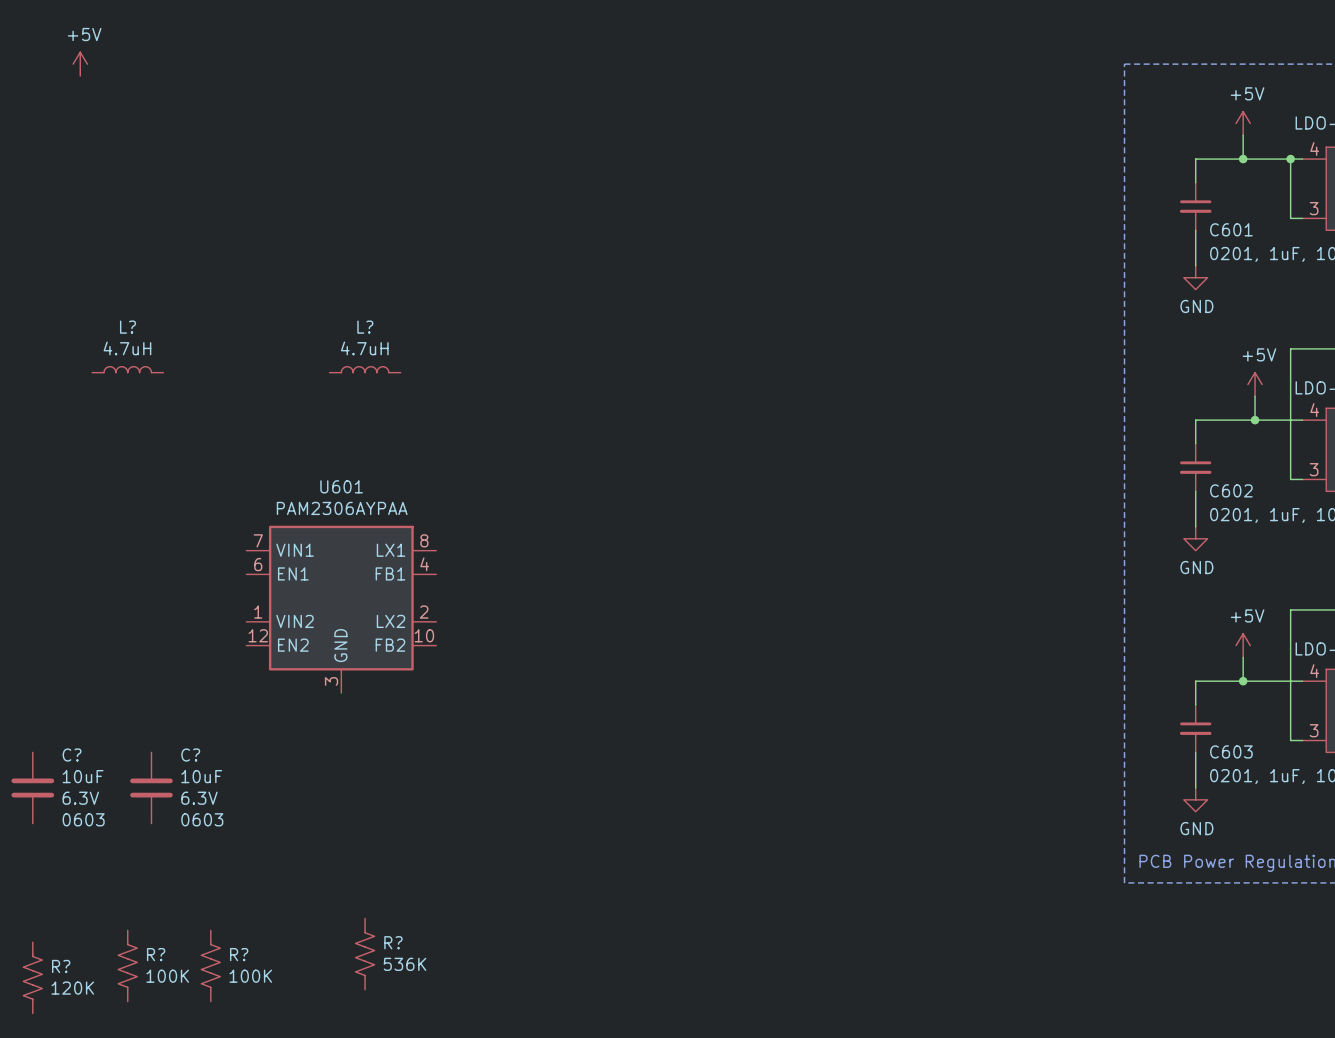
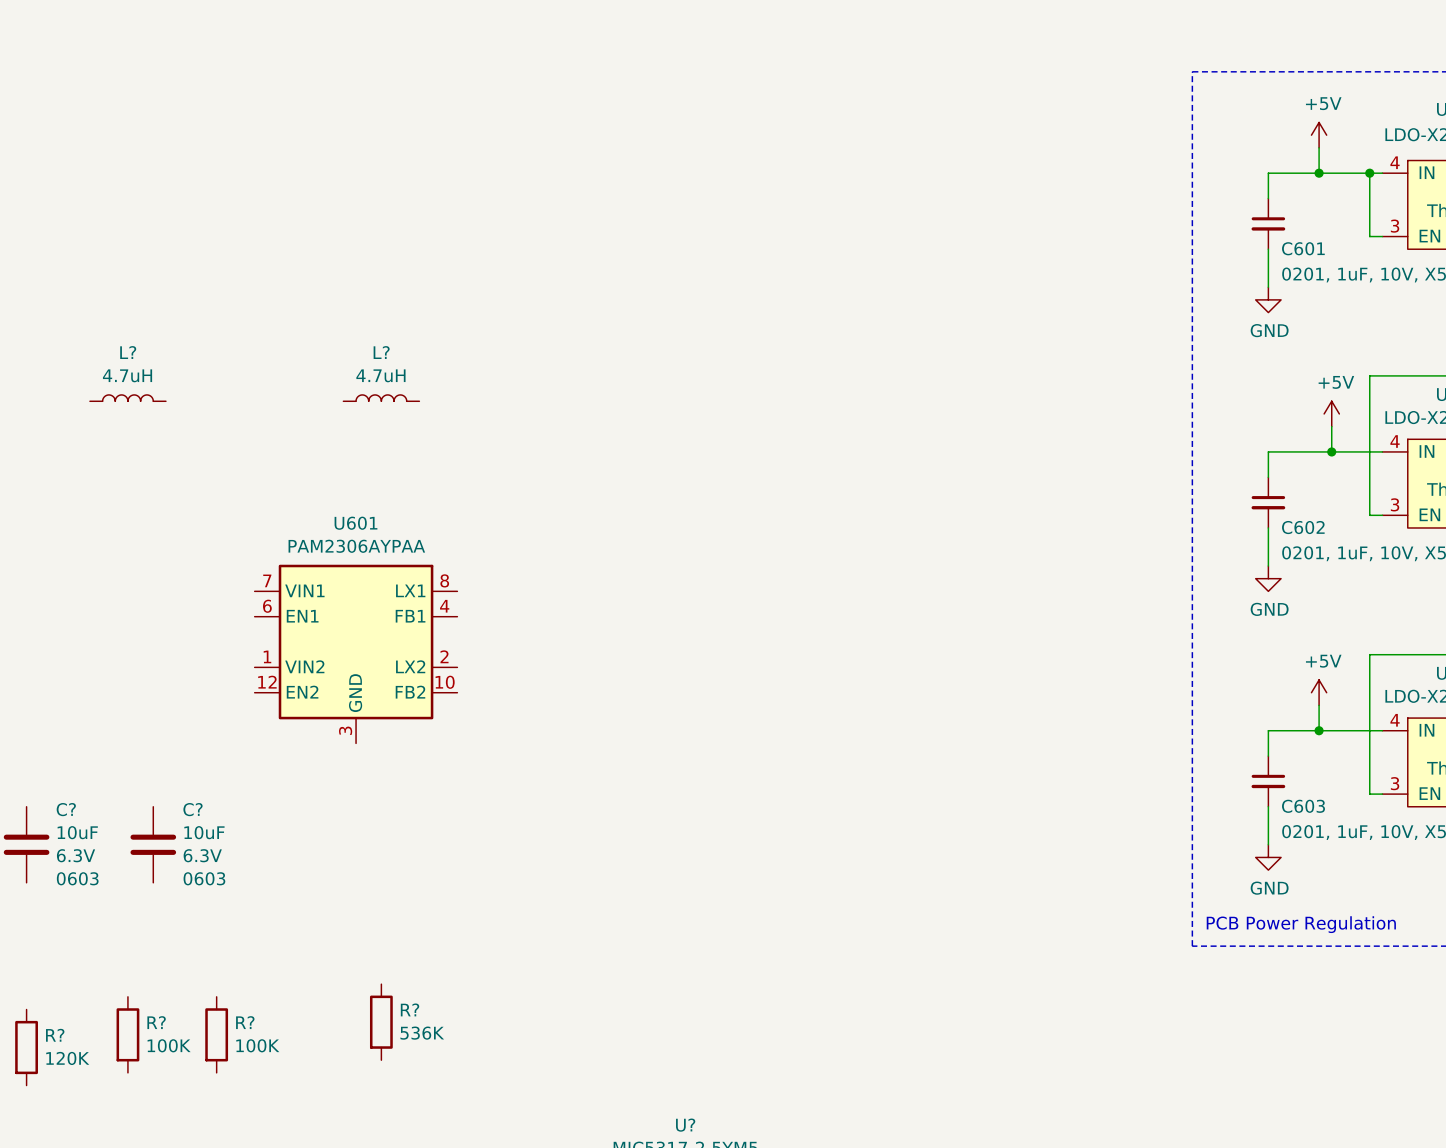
power symbol: +5V (80, 64) -> none
R? symbol: [355, 918, 375, 990] -> [369, 984, 393, 1061]
R? symbol: [118, 930, 138, 1002] -> [116, 996, 140, 1073]
R? symbol: [201, 930, 221, 1002] -> [205, 996, 229, 1073]
R? symbol: [23, 942, 43, 1014] -> [15, 1009, 38, 1086]

